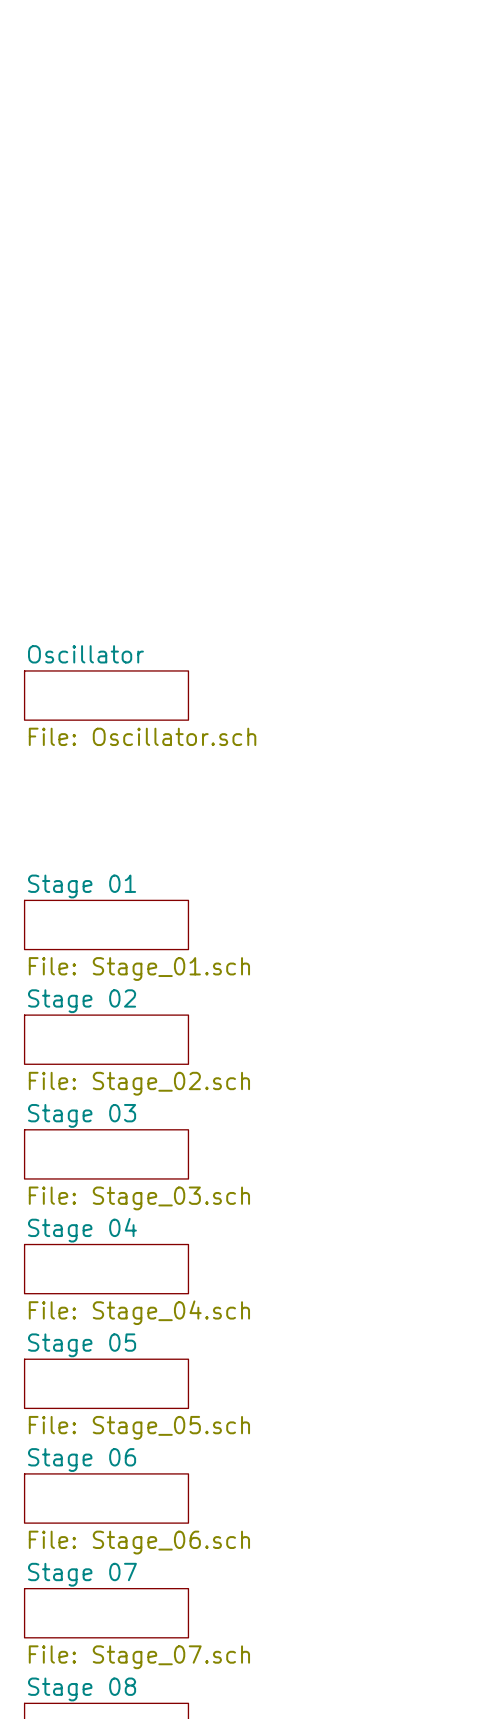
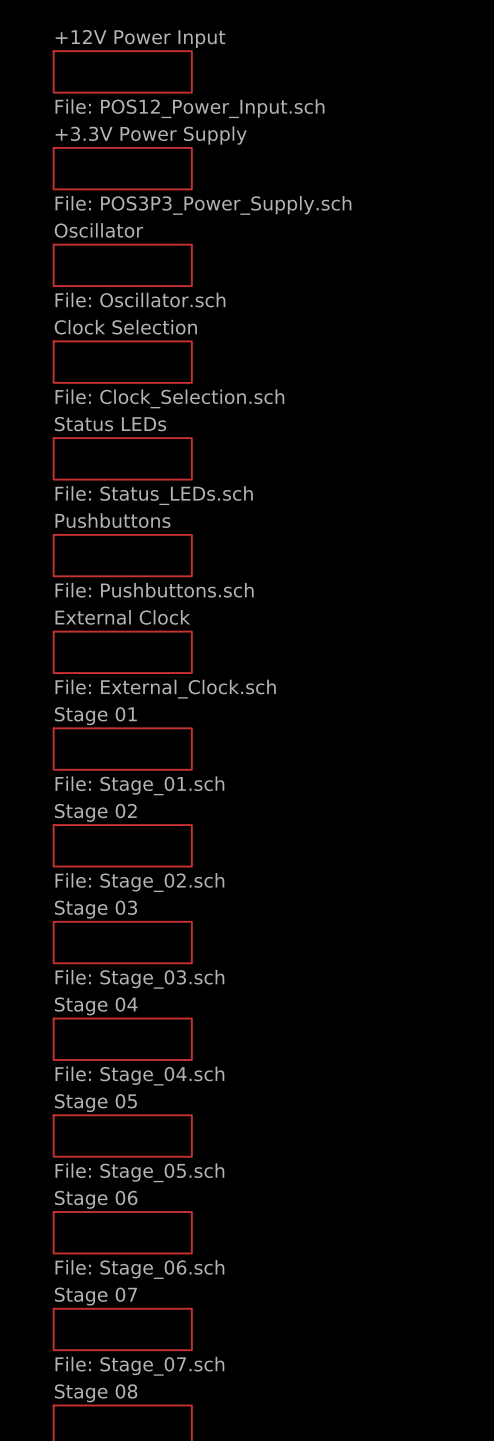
sheet +12V Power Input: none -> File: POS12_Power_Input.sch (122, 71)
sheet +3.3V Power Supply: none -> File: POS3P3_Power_Supply.sch (122, 168)
sheet Oscillator: none -> File: Oscillator.sch (122, 265)
sheet Clock Selection: none -> File: Clock_Selection.sch (122, 362)
sheet Status LEDs: none -> File: Status_LEDs.sch (122, 458)
sheet Oscillator name: Oscillator (85, 654) -> Pushbuttons (112, 520)
sheet Oscillator value: File: Oscillator.sch (142, 736) -> File: Pushbuttons.sch (154, 590)
sheet External Clock: none -> File: External_Clock.sch (122, 652)

